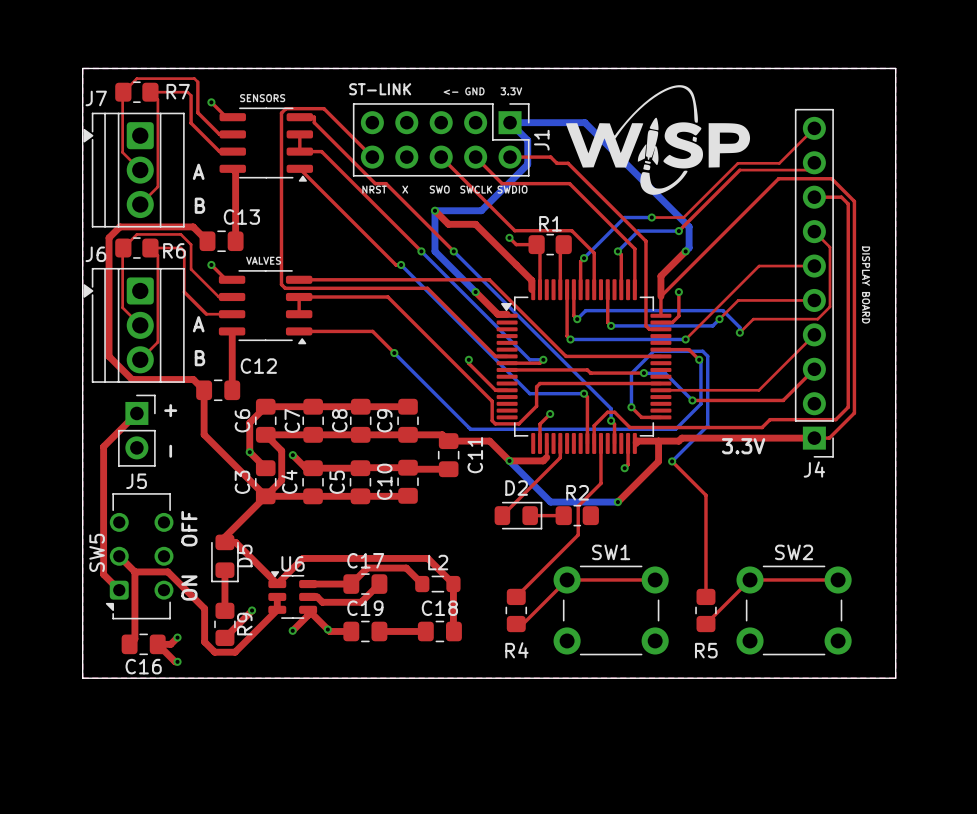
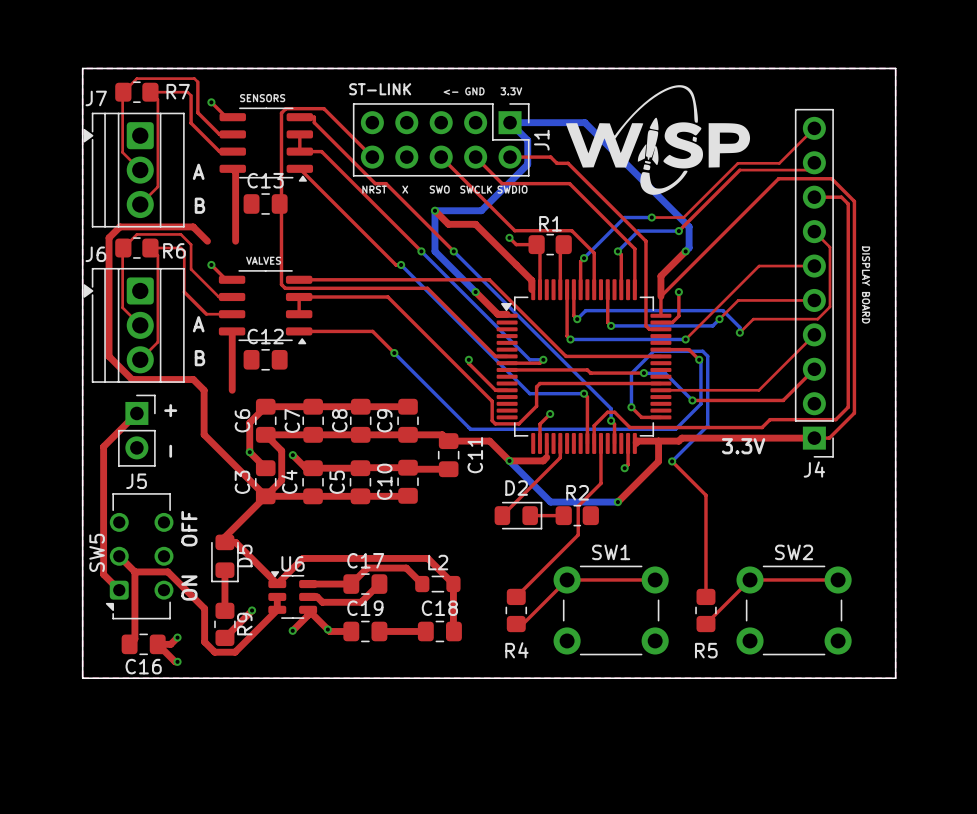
C13 name position: C13 (241, 217) -> C13 (265, 180)
C13 position: (221, 241) -> (265, 203)
C12 name position: C12 (258, 366) -> C12 (265, 336)
C12 position: (218, 390) -> (265, 359)

